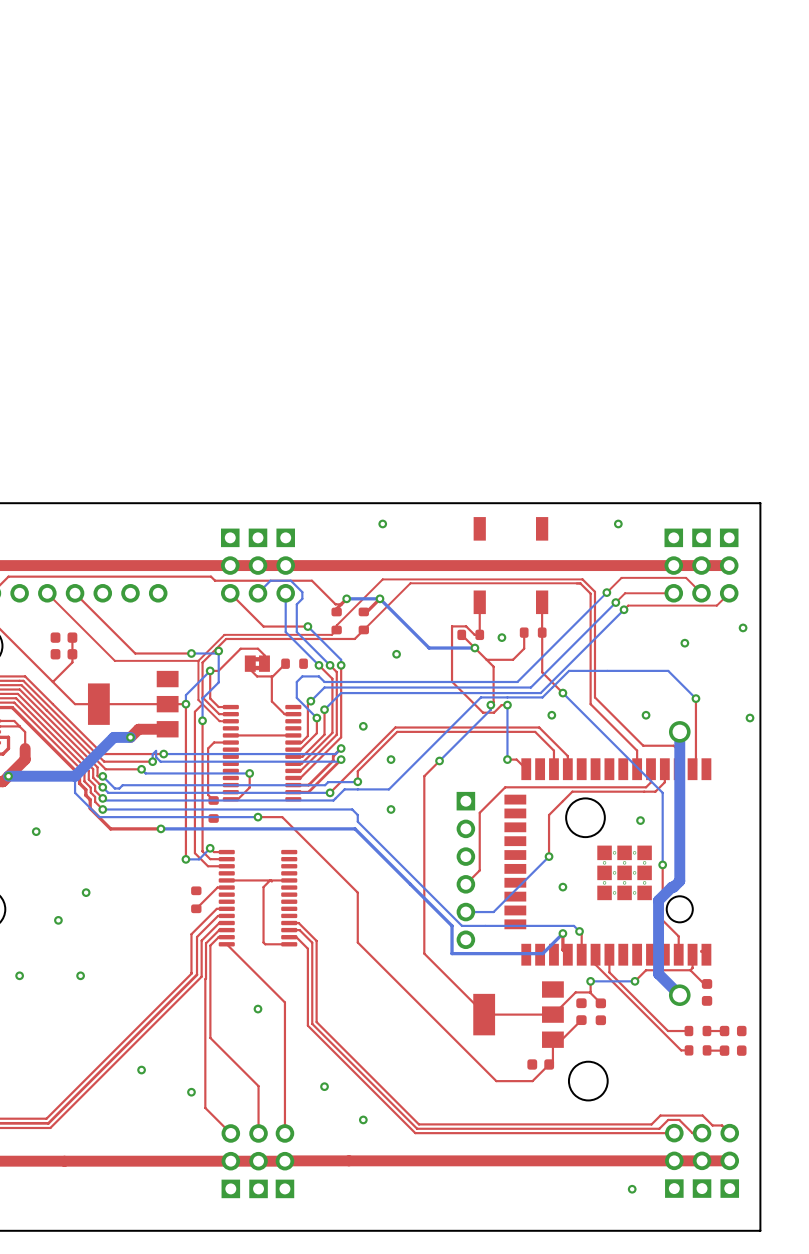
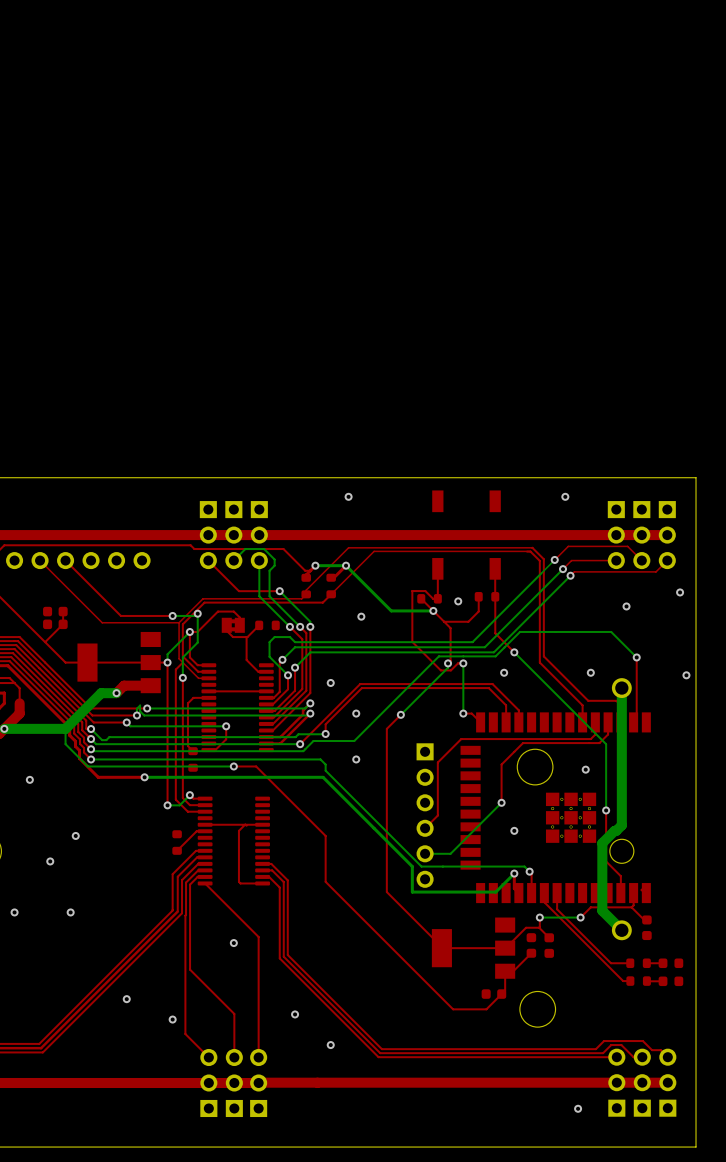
part: (63, 637) -> none
top track: (72, 637) (72, 648) -> none
part: none -> (55, 611)
part: (63, 654) -> none
part: none -> (55, 624)

